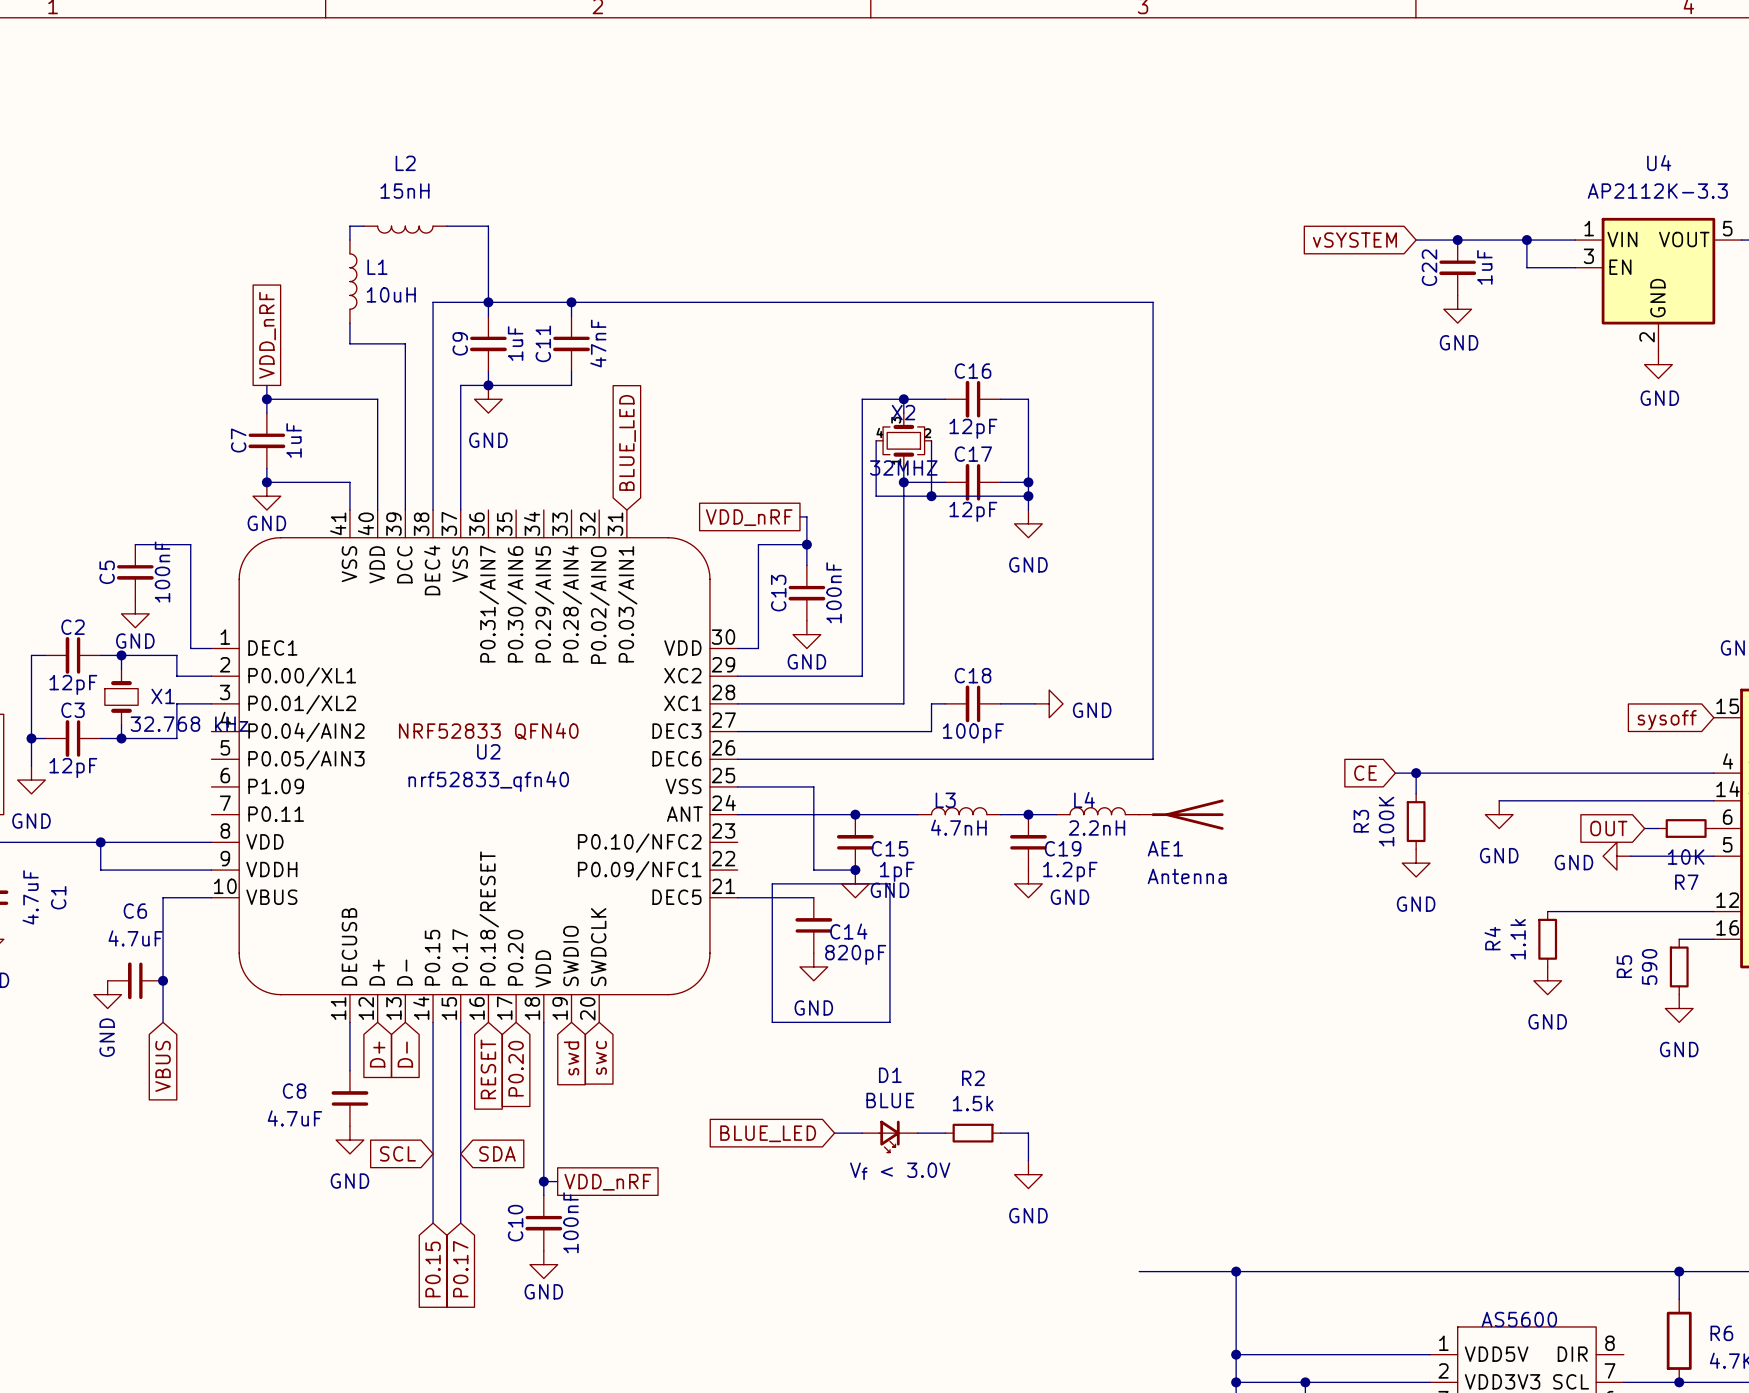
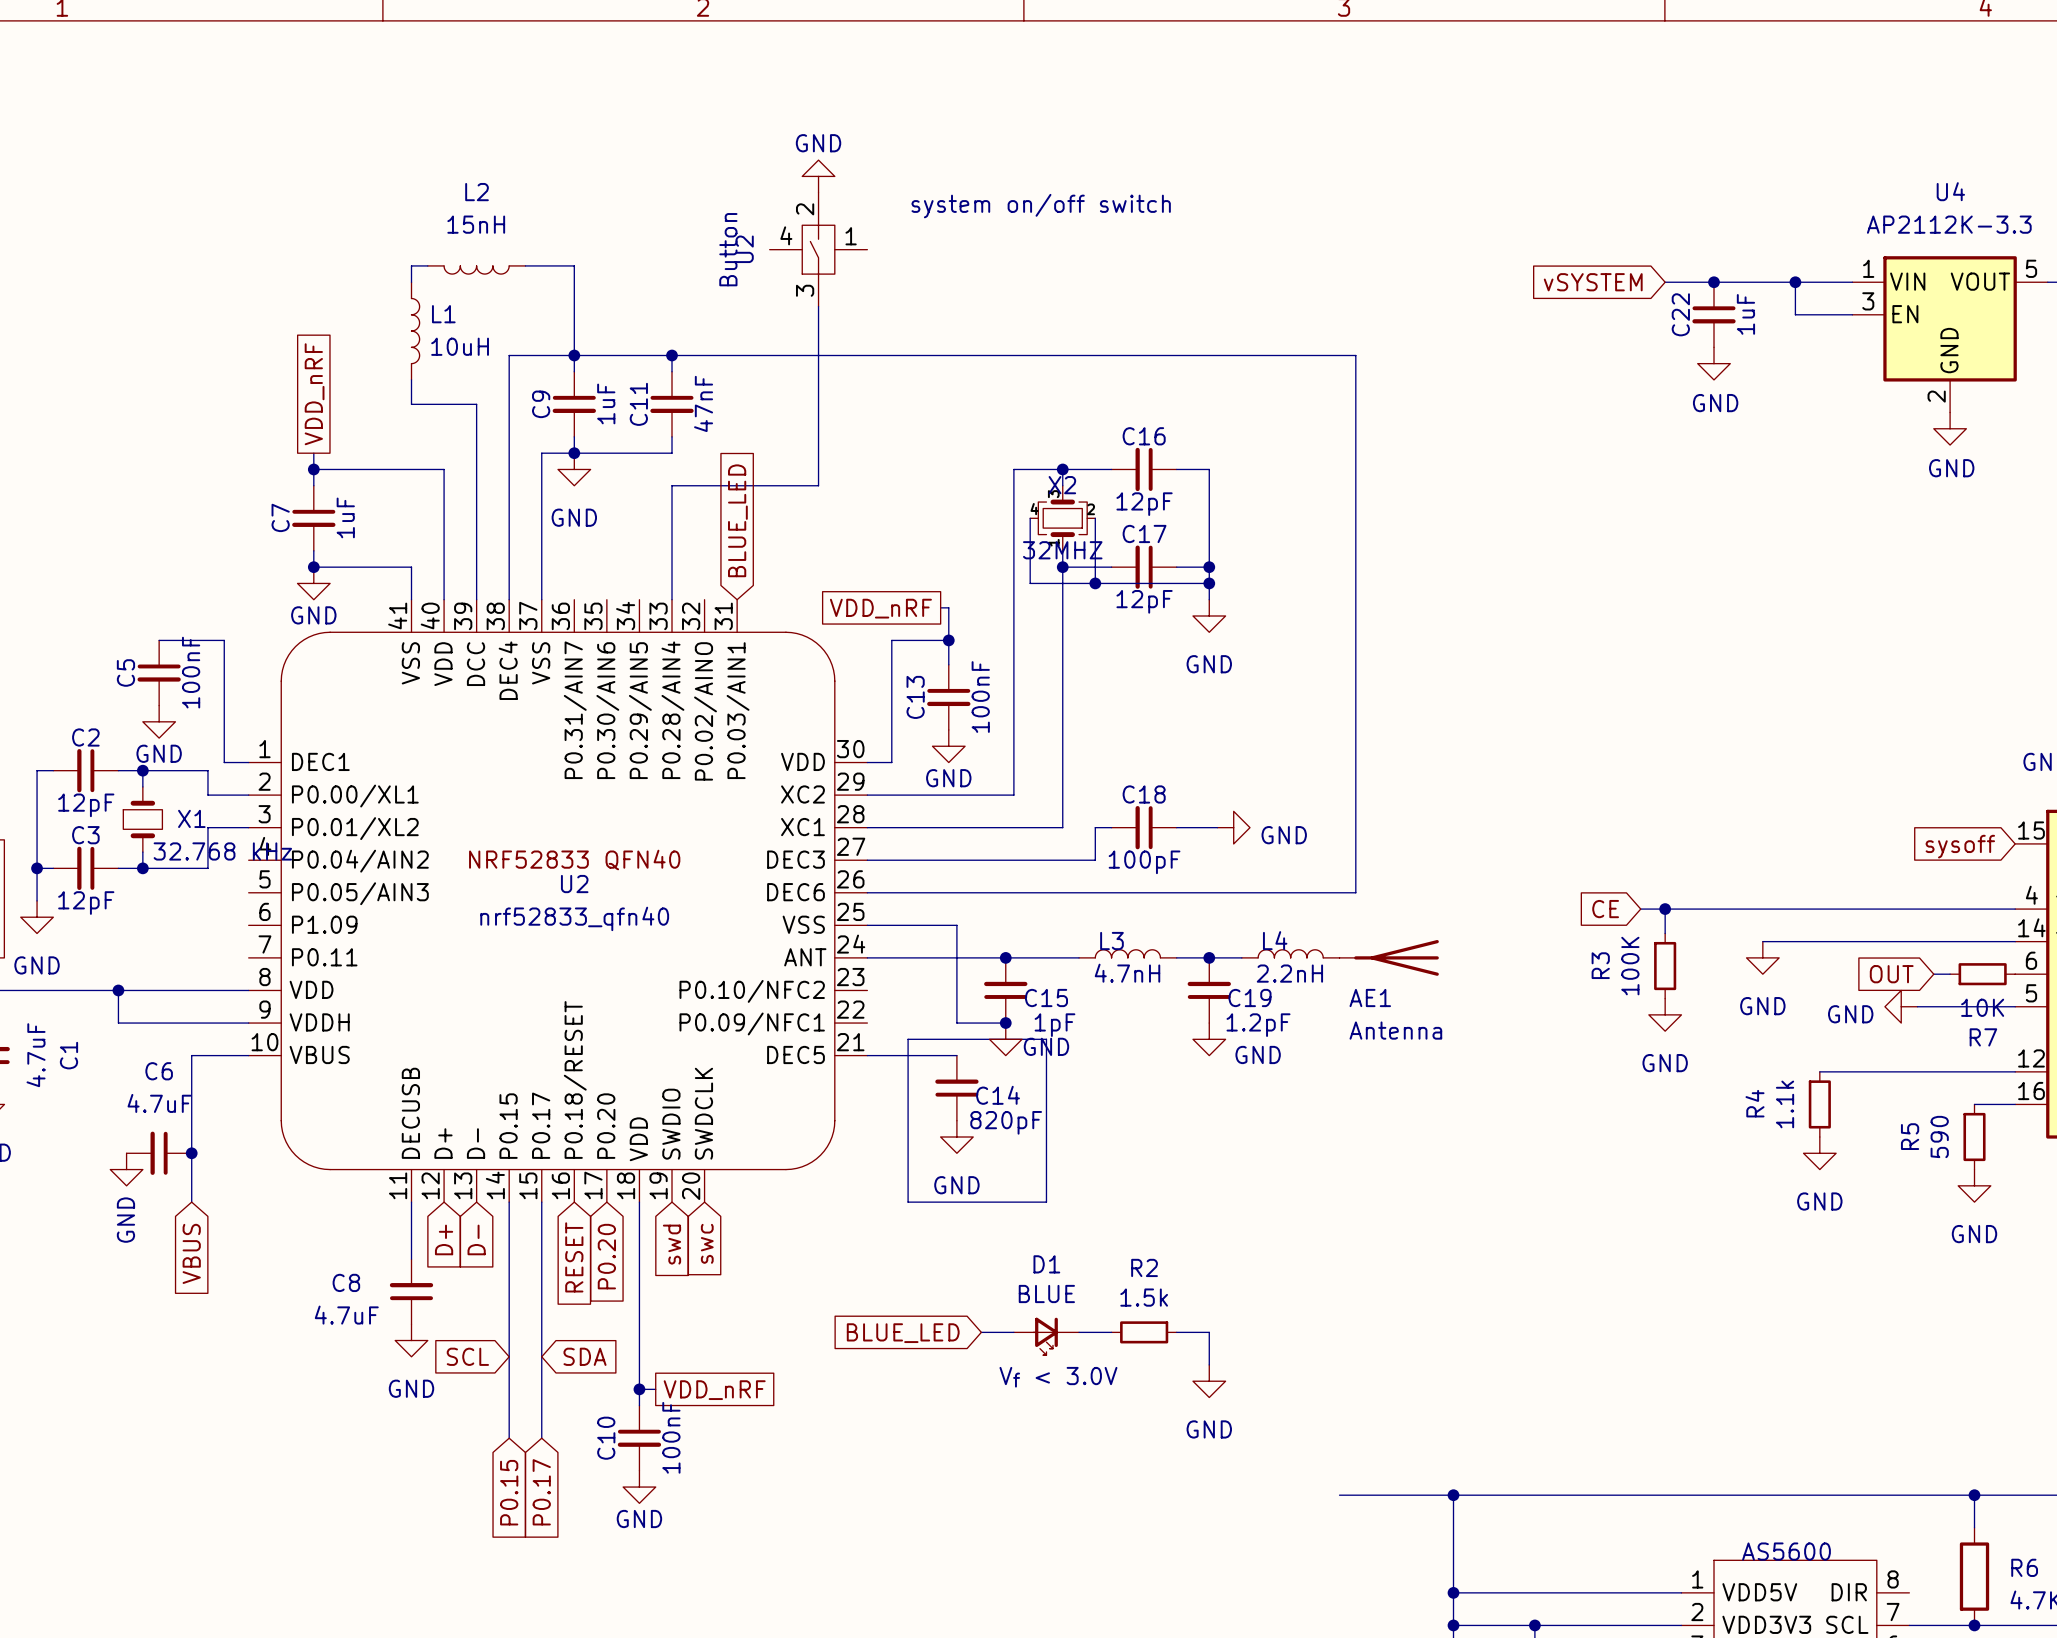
power symbol: none -> GND (818, 176)
text: none -> system on/off switch (1041, 206)
U2: none -> Button (818, 249)
wire: none -> (818, 306) (818, 485) (672, 485) (672, 599)

